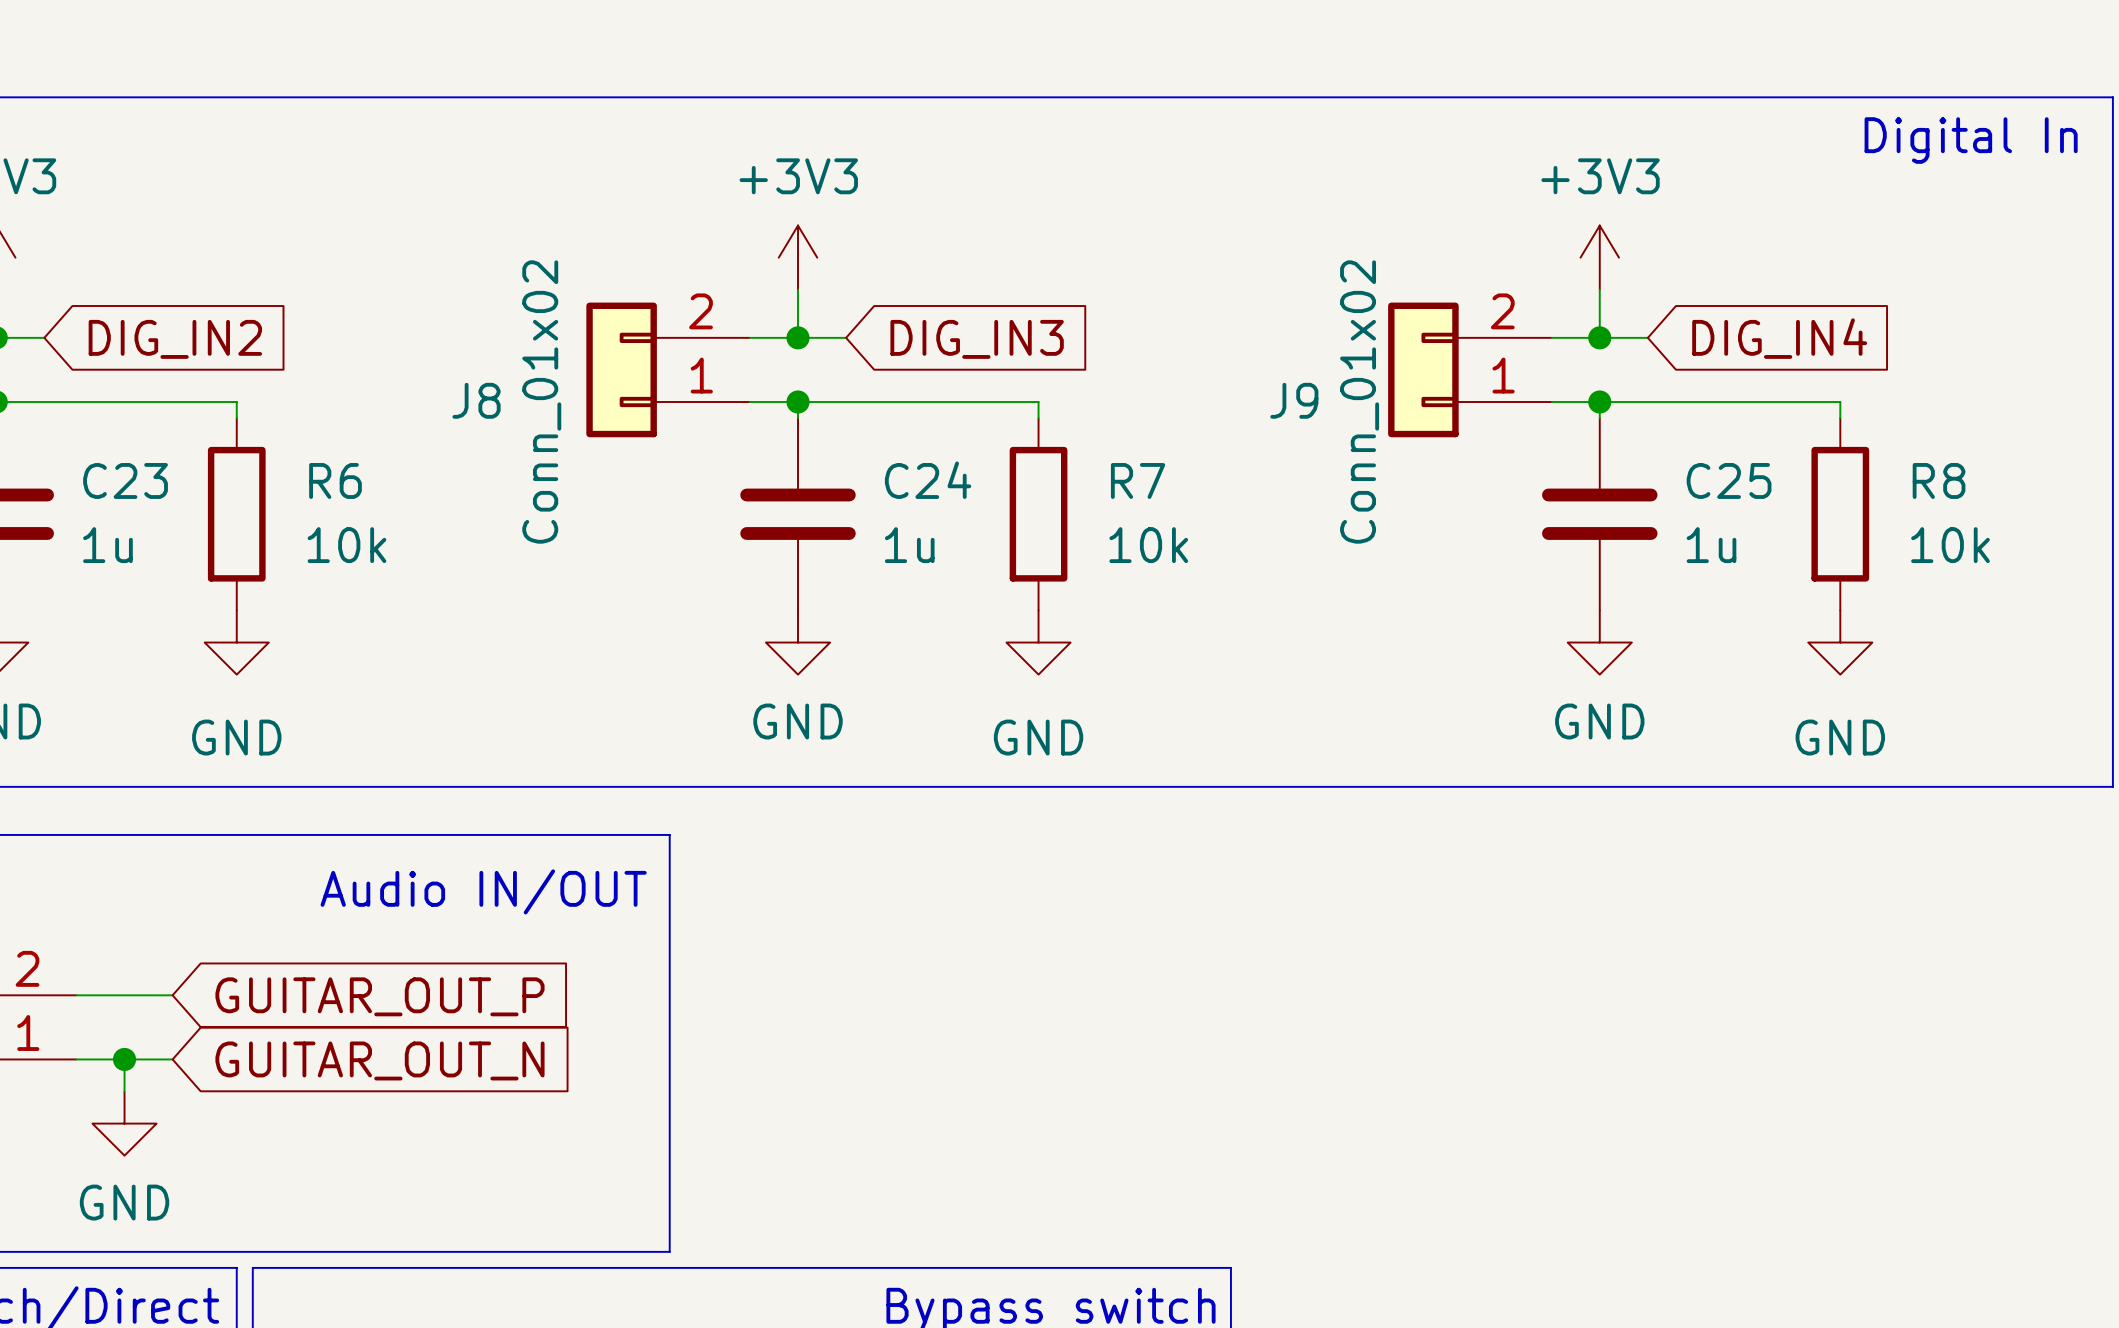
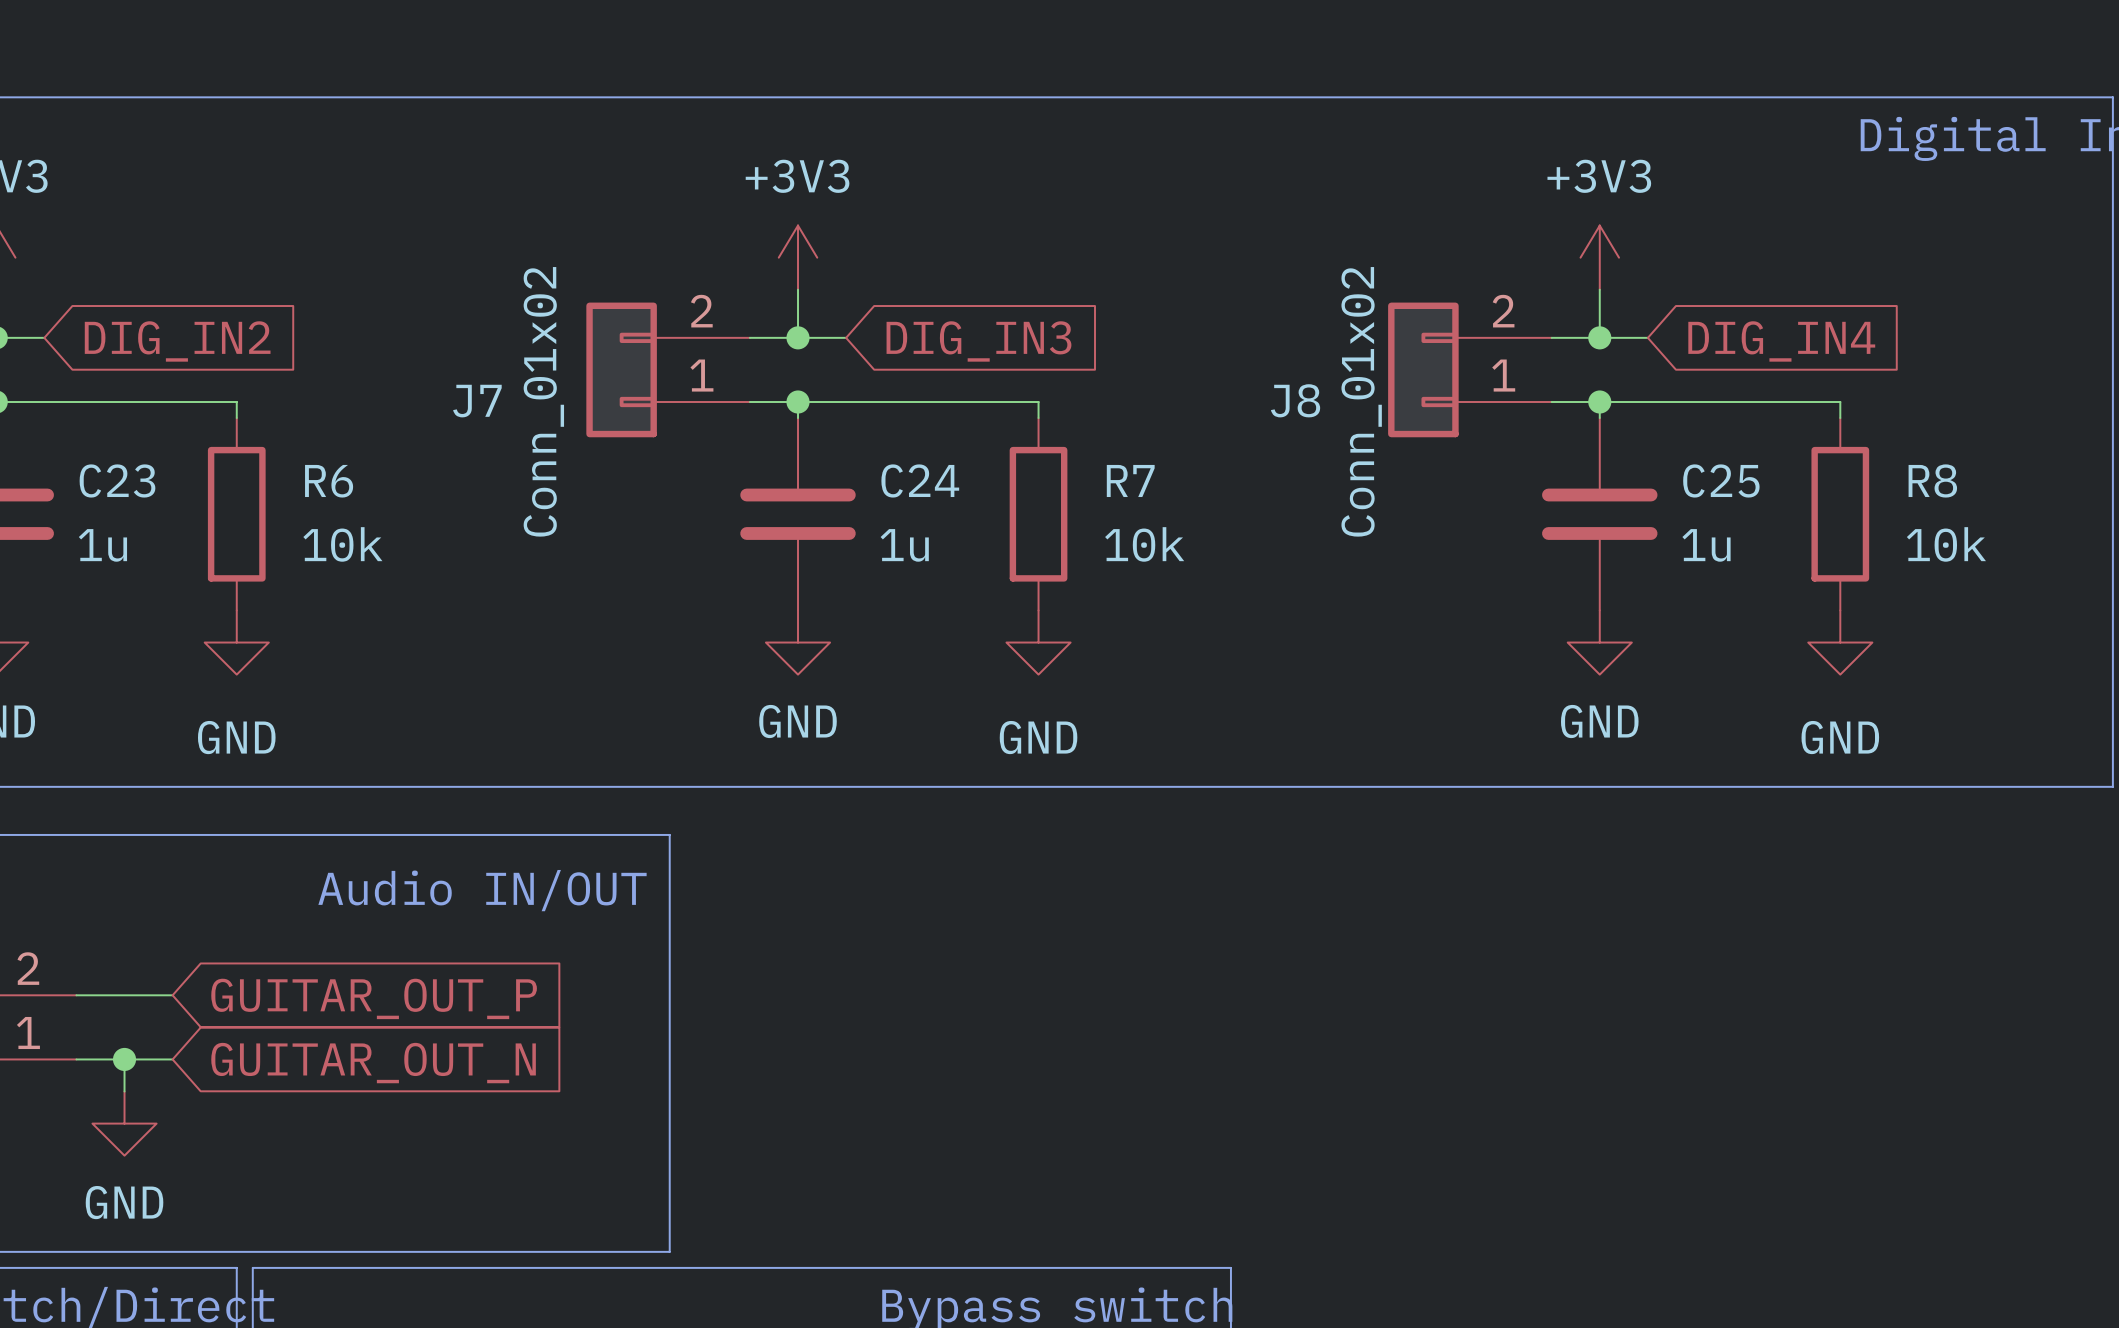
J8 name: J8 (476, 400) -> J7 (477, 401)
J9 name: J9 (1294, 400) -> J8 (1295, 400)

